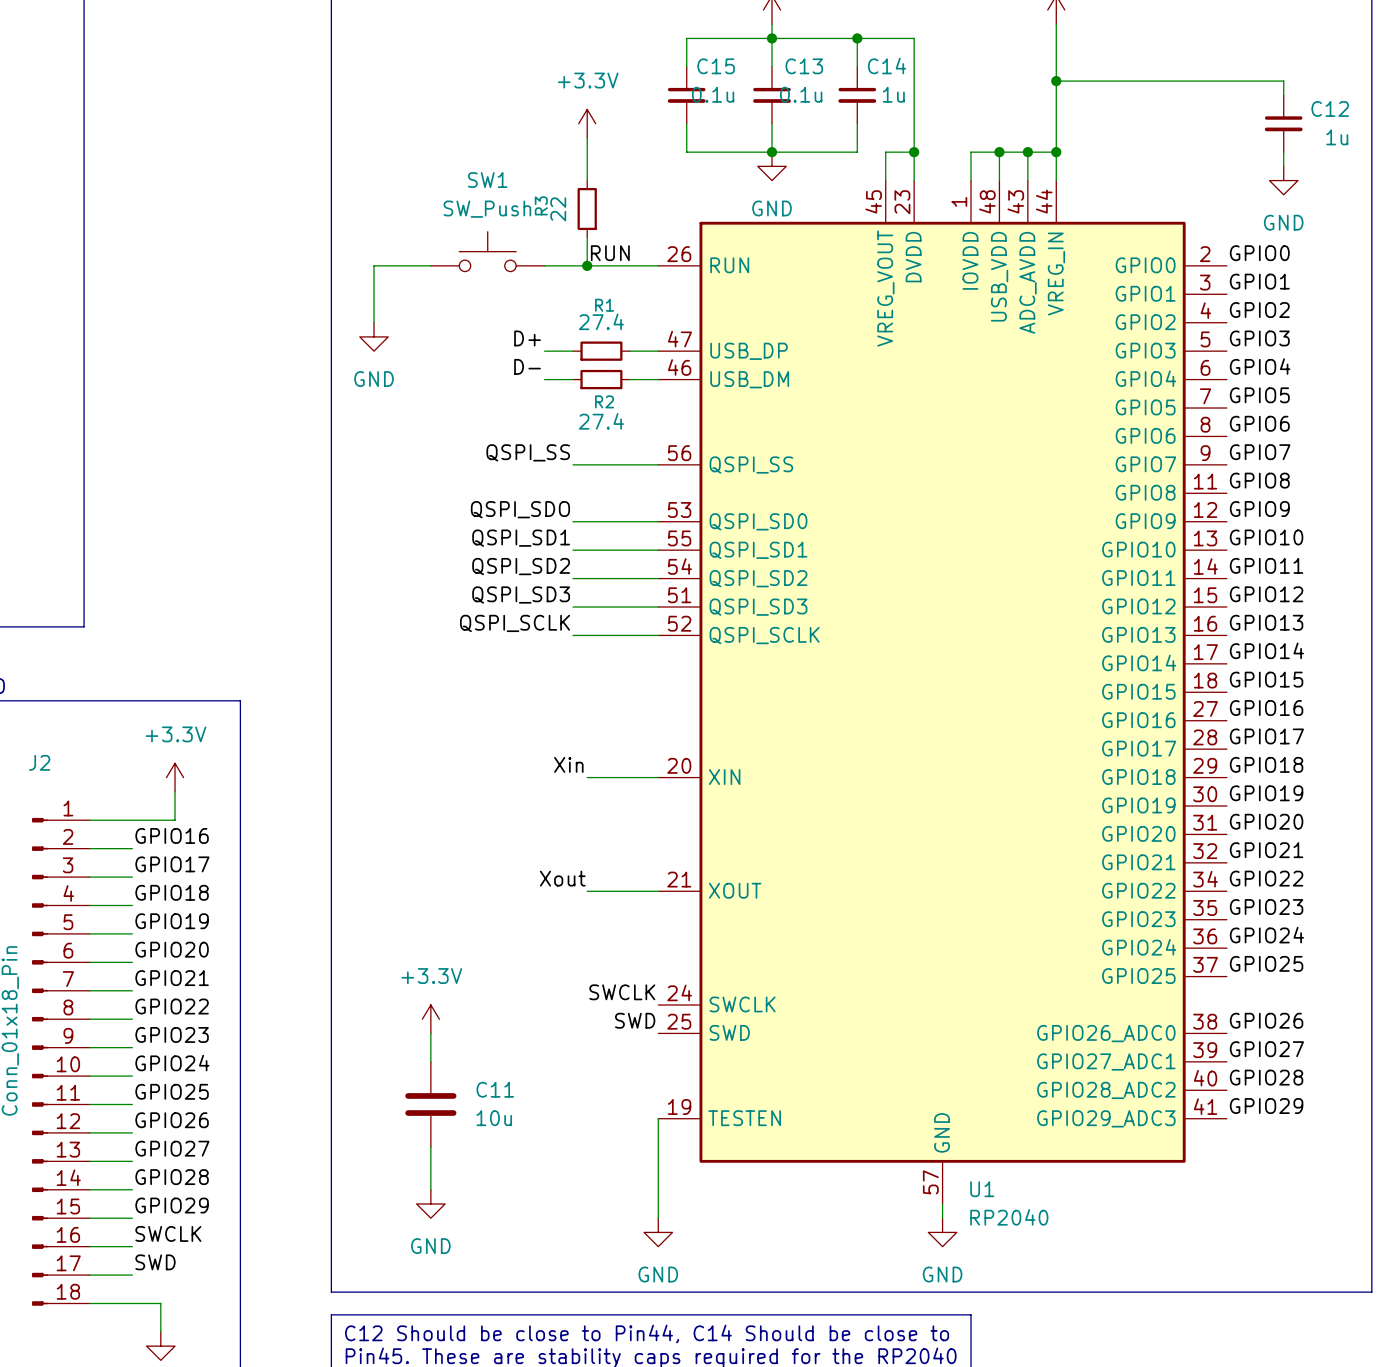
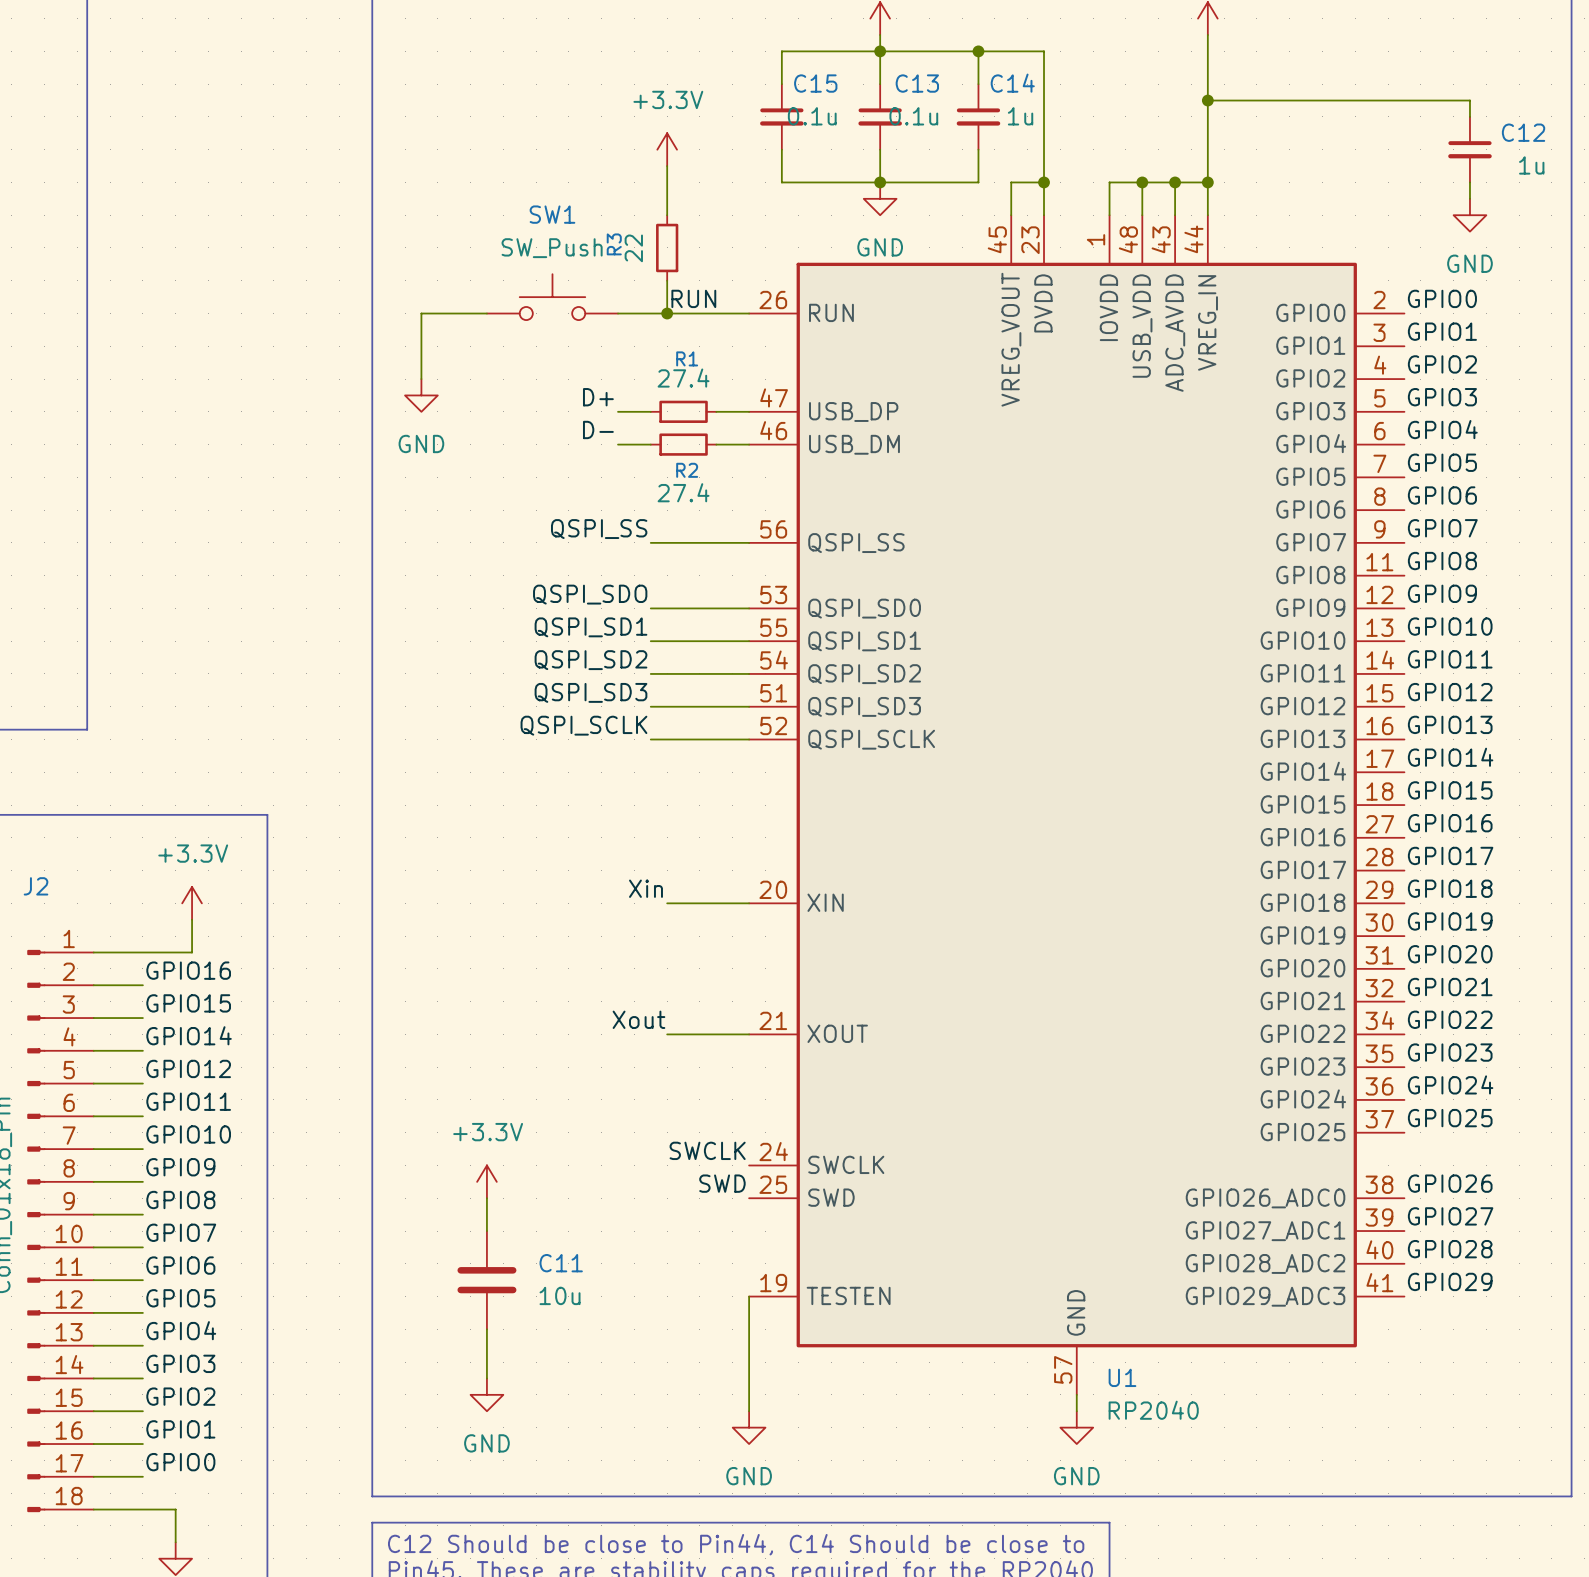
label: GPIO17 (172, 864) -> GPIO15 (188, 1003)
label: GPIO18 (172, 892) -> GPIO14 (189, 1035)
label: GPIO19 (172, 921) -> GPIO12 (188, 1068)
label: GPIO20 (172, 949) -> GPIO11 (188, 1101)
label: GPIO21 (172, 978) -> GPIO10 (188, 1134)
label: GPIO22 (172, 1006) -> GPIO9 (180, 1167)
label: GPIO23 (172, 1034) -> GPIO8 (180, 1200)
label: GPIO24 (172, 1063) -> GPIO7 (181, 1232)
label: GPIO25 (172, 1091) -> GPIO6 (180, 1265)
label: GPIO26 (172, 1120) -> GPIO5 (180, 1298)
label: GPIO27 (172, 1148) -> GPIO4 (181, 1330)
label: GPIO28 (172, 1177) -> GPIO3 (180, 1363)
label: GPIO29 (172, 1205) -> GPIO2 (180, 1396)
label: SWCLK (168, 1233) -> GPIO1 (180, 1429)
label: SWD (155, 1262) -> GPIO0 (180, 1462)

